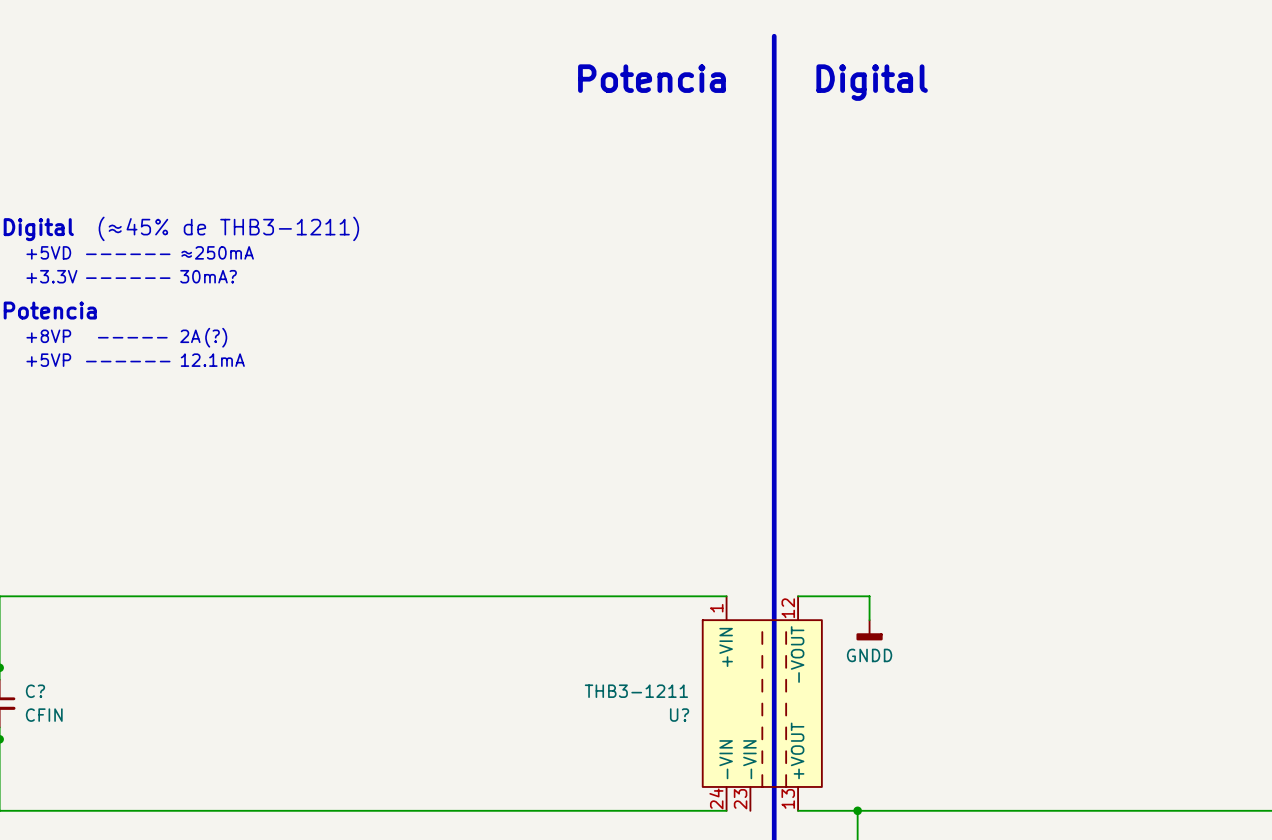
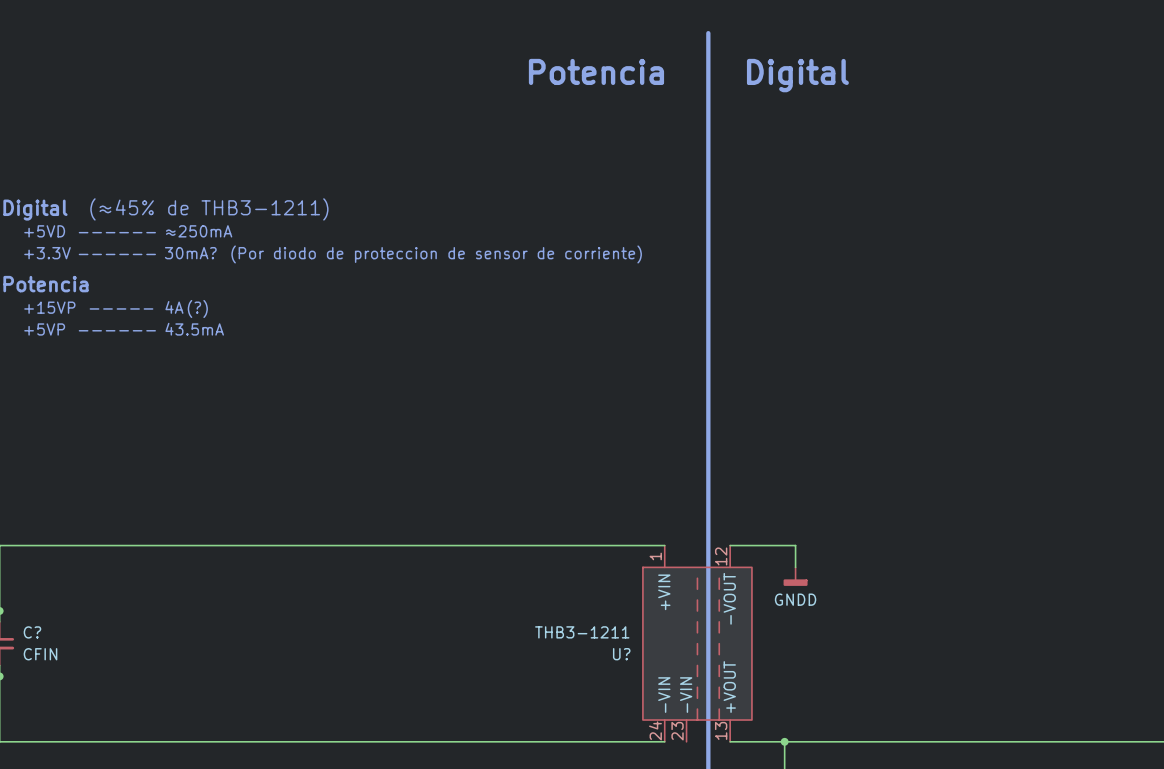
text: none -> (Por diodo de proteccion de sensor de corriente) (436, 254)
text: +8VP (48, 336) -> +15VP (49, 307)
text: 2A (190, 336) -> 4A (174, 307)
text: 12.1mA (212, 360) -> 43.5mA (194, 329)

